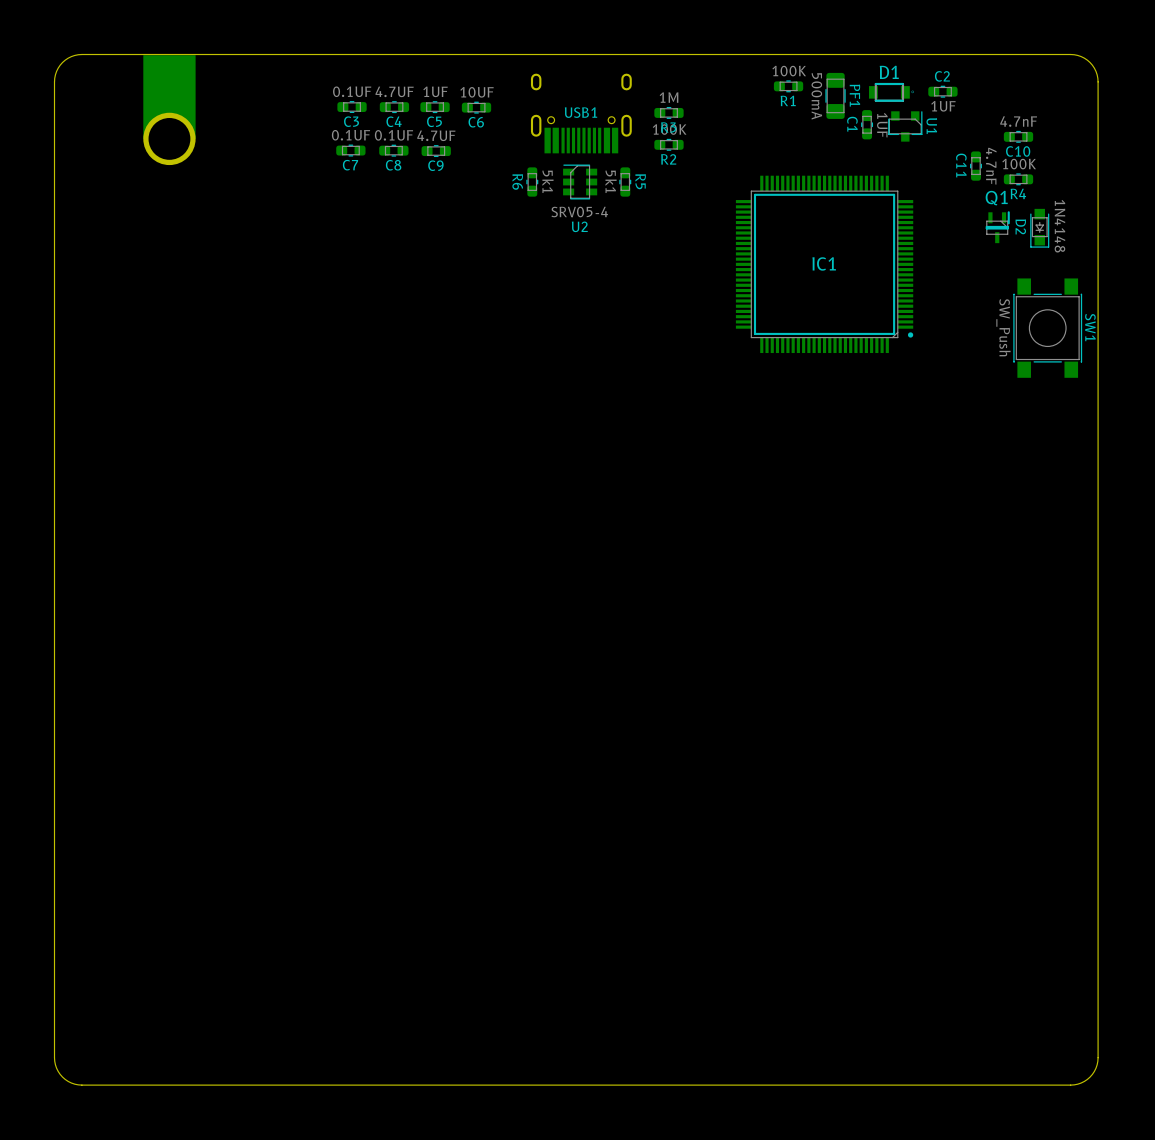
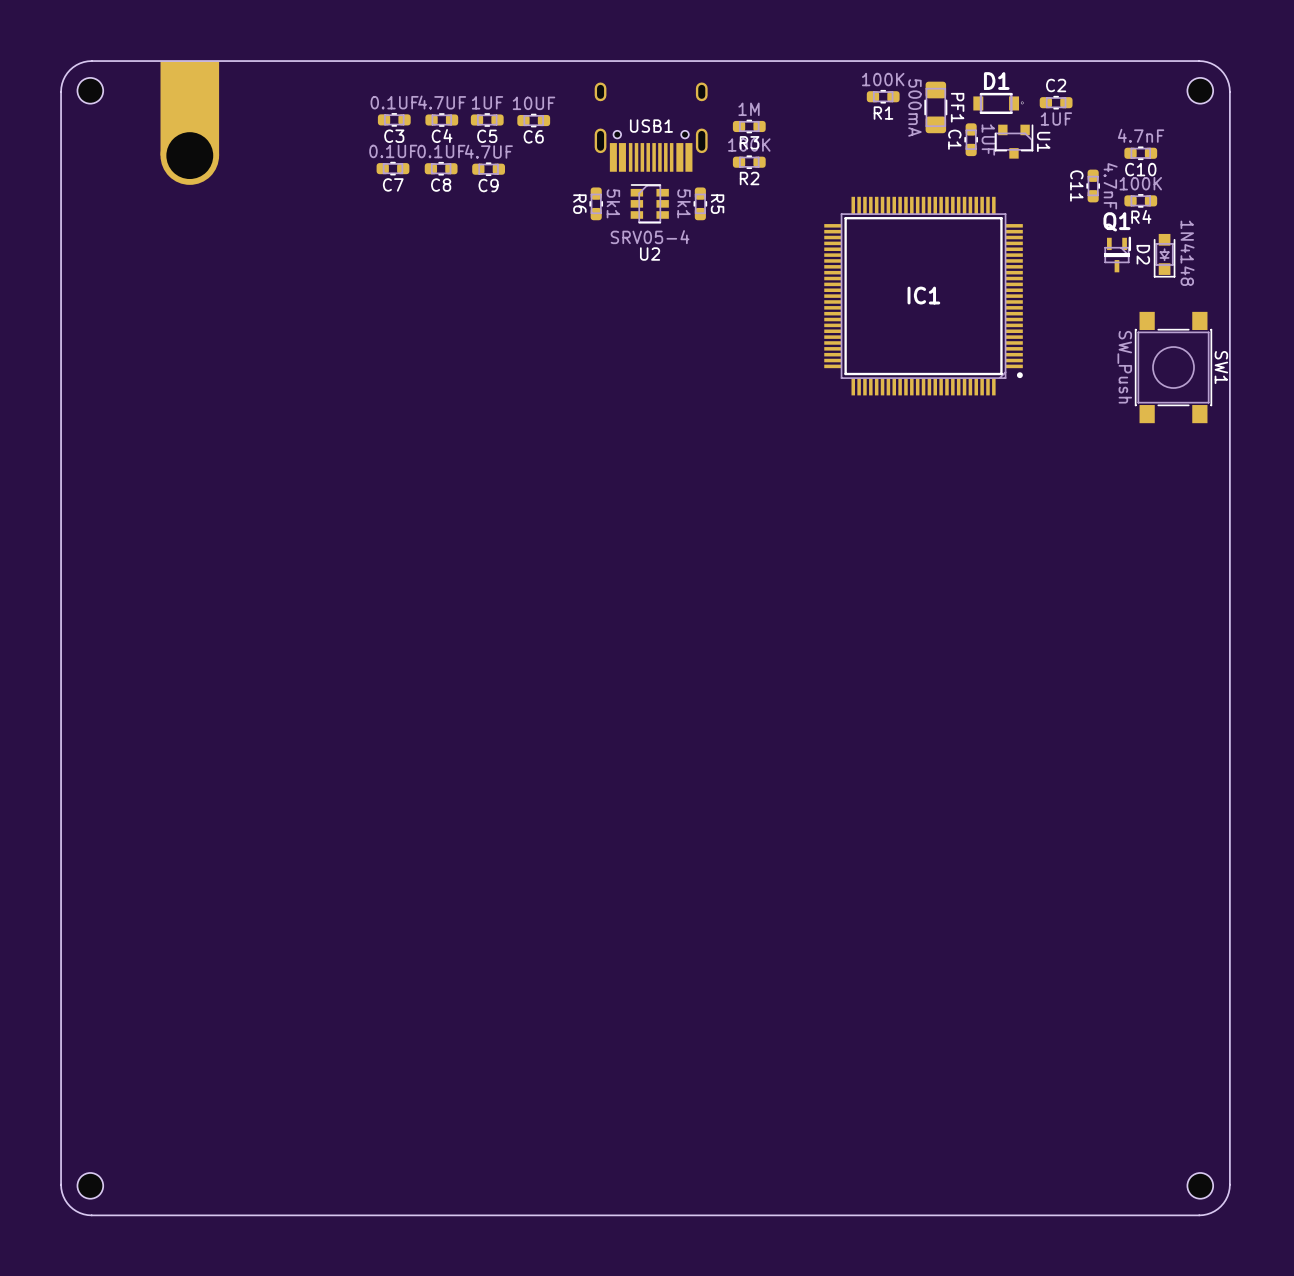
part: none -> (90, 90)
part: none -> (1200, 90)
part: none -> (90, 1185)
part: none -> (1200, 1185)

